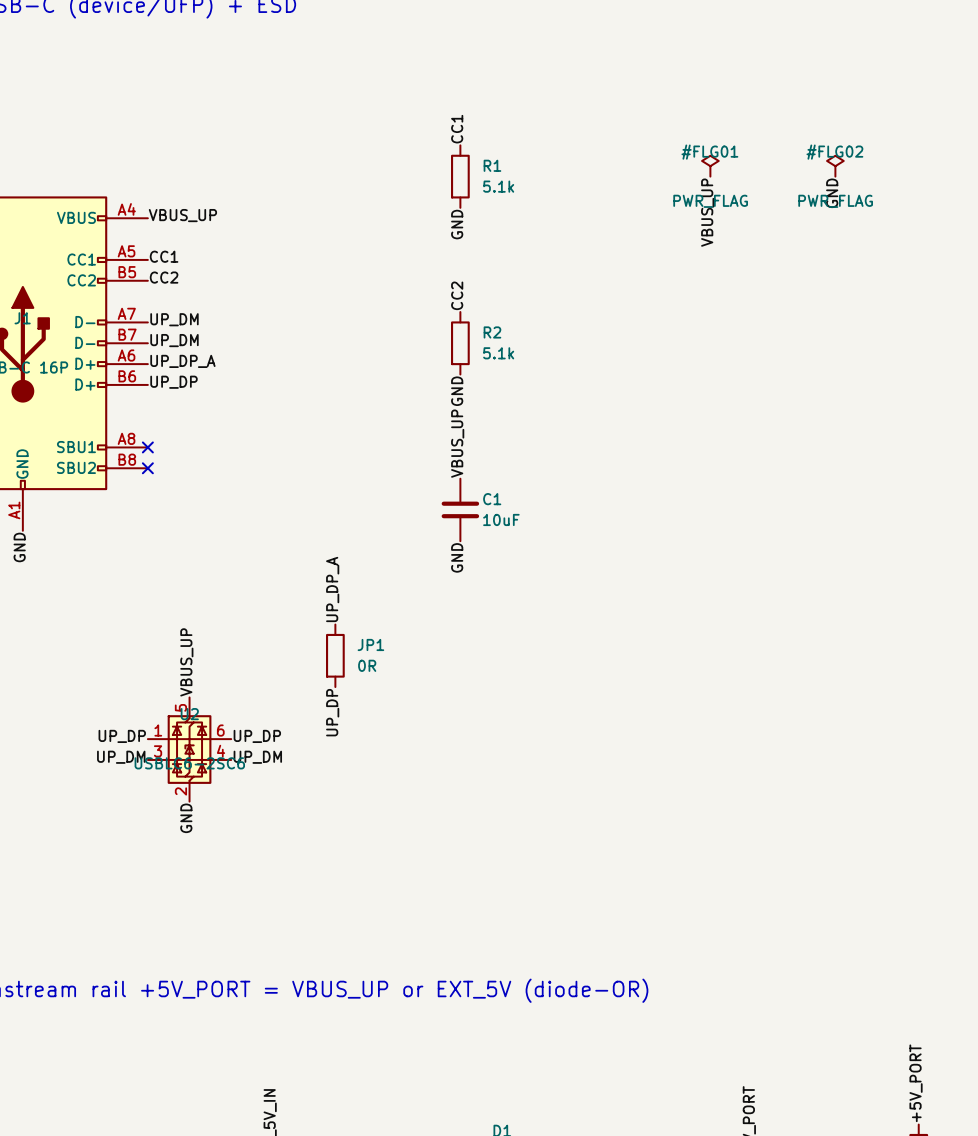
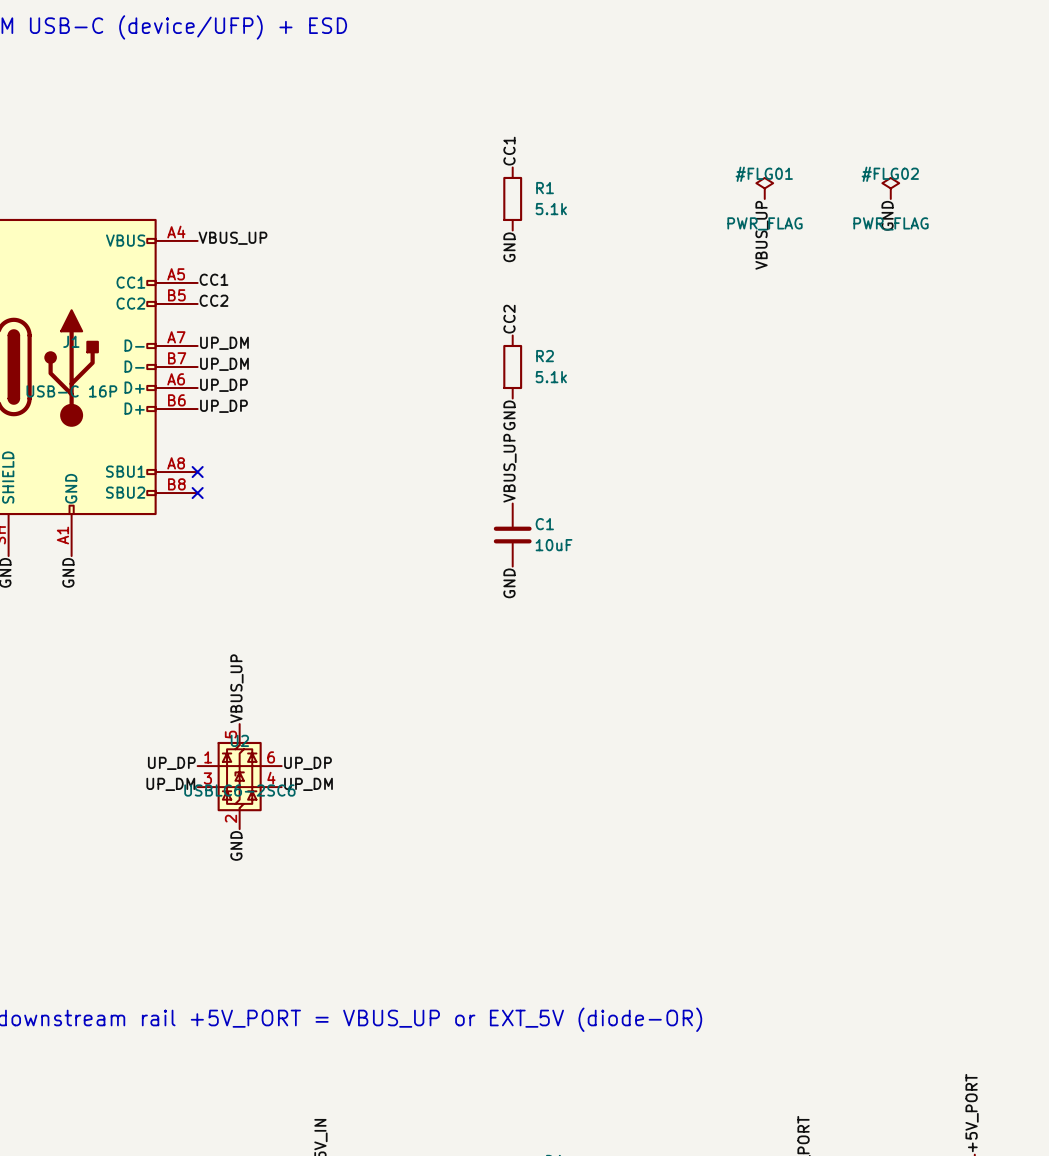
label: UP_DP_A (182, 361) -> UP_DP (223, 385)
label: UP_DP_A (332, 589) -> none
JP1: 0R (335, 655) -> none
label: UP_DP (332, 712) -> none

